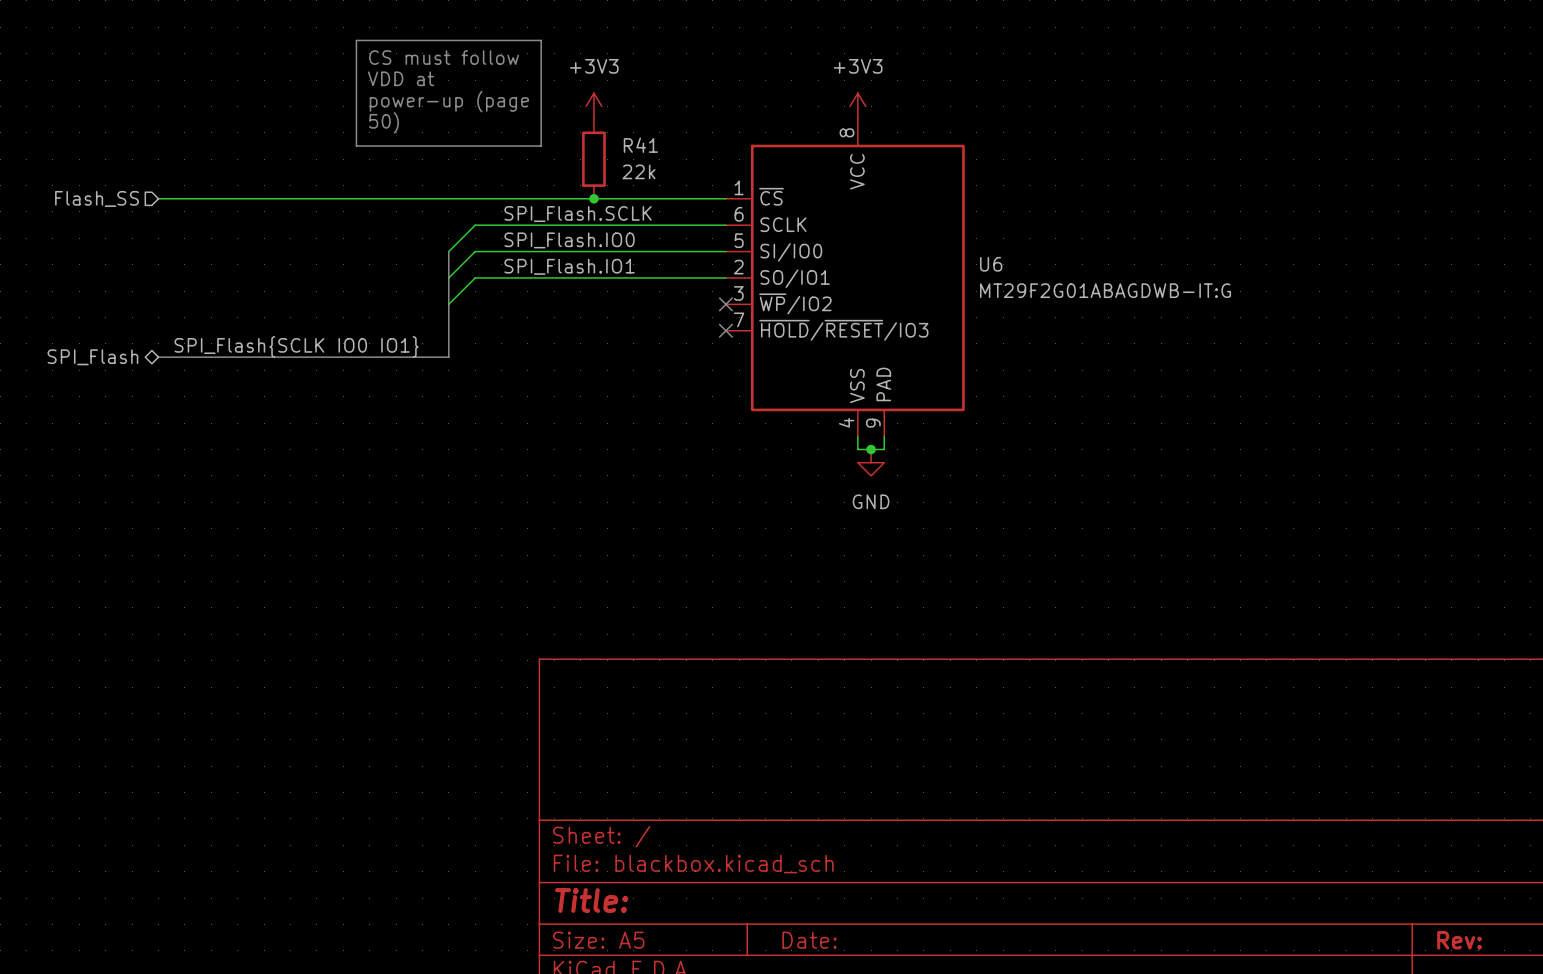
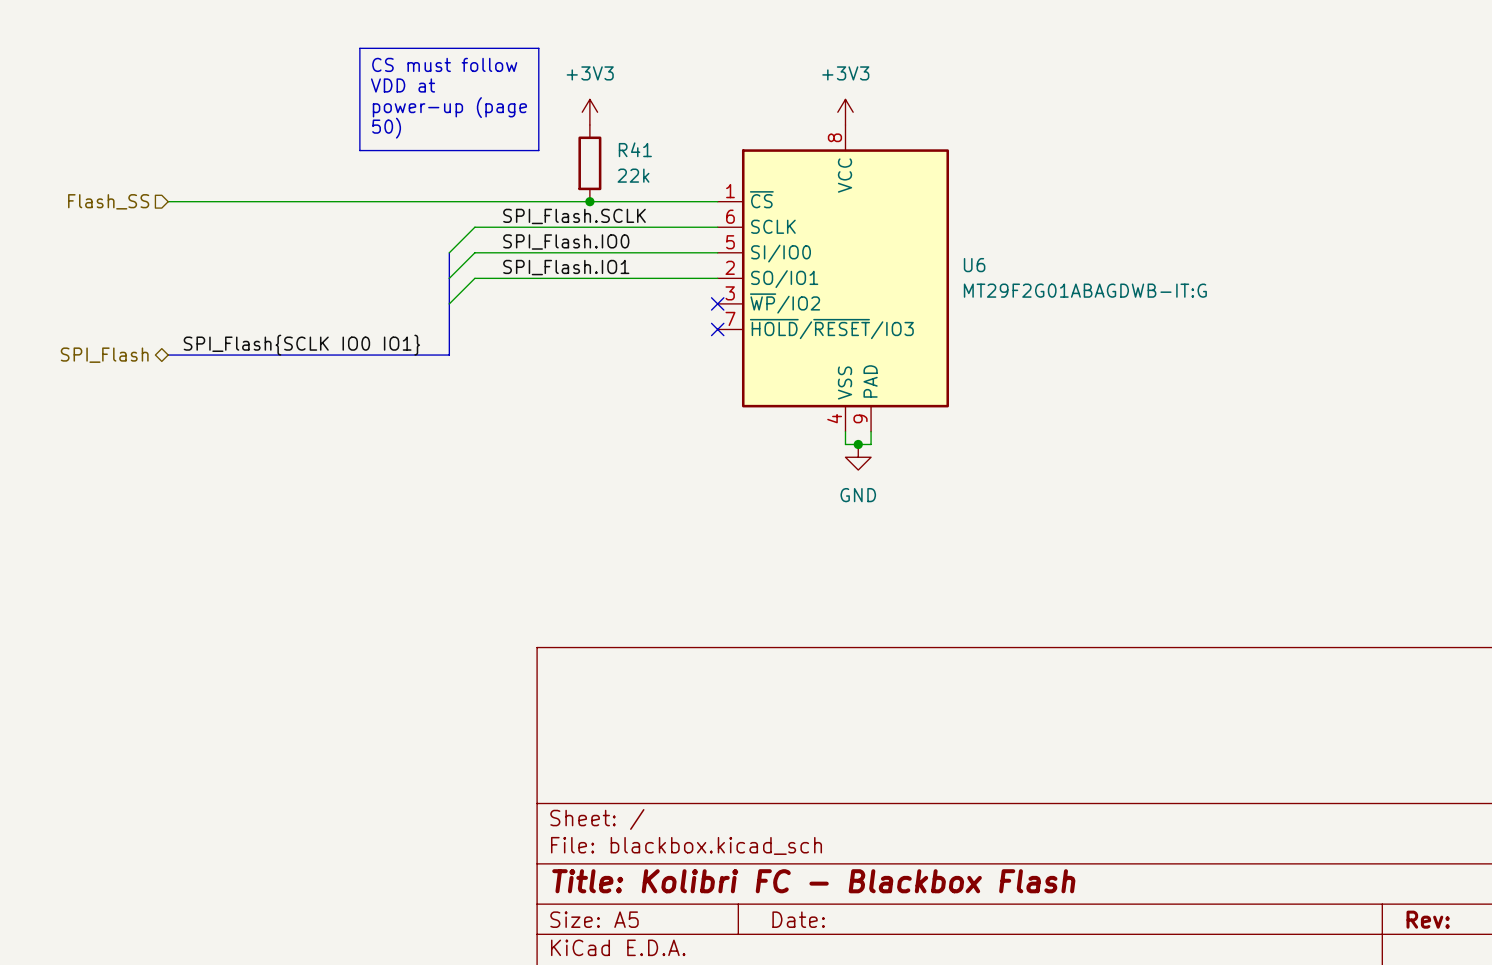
title block: Title: (591, 900) -> Title: Kolibri FC - Blackbox Flash (813, 881)

